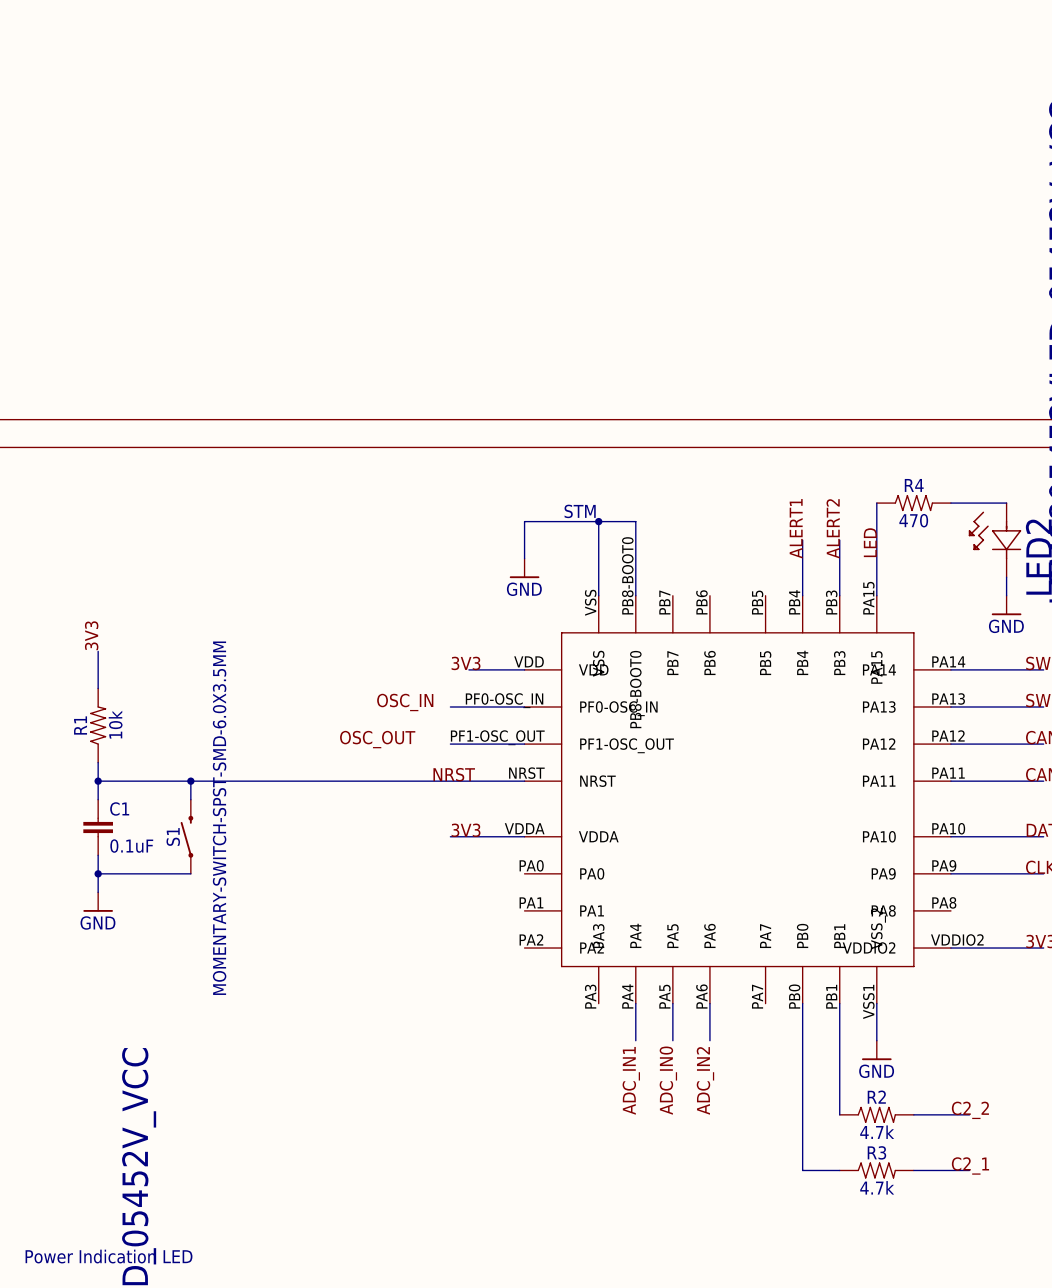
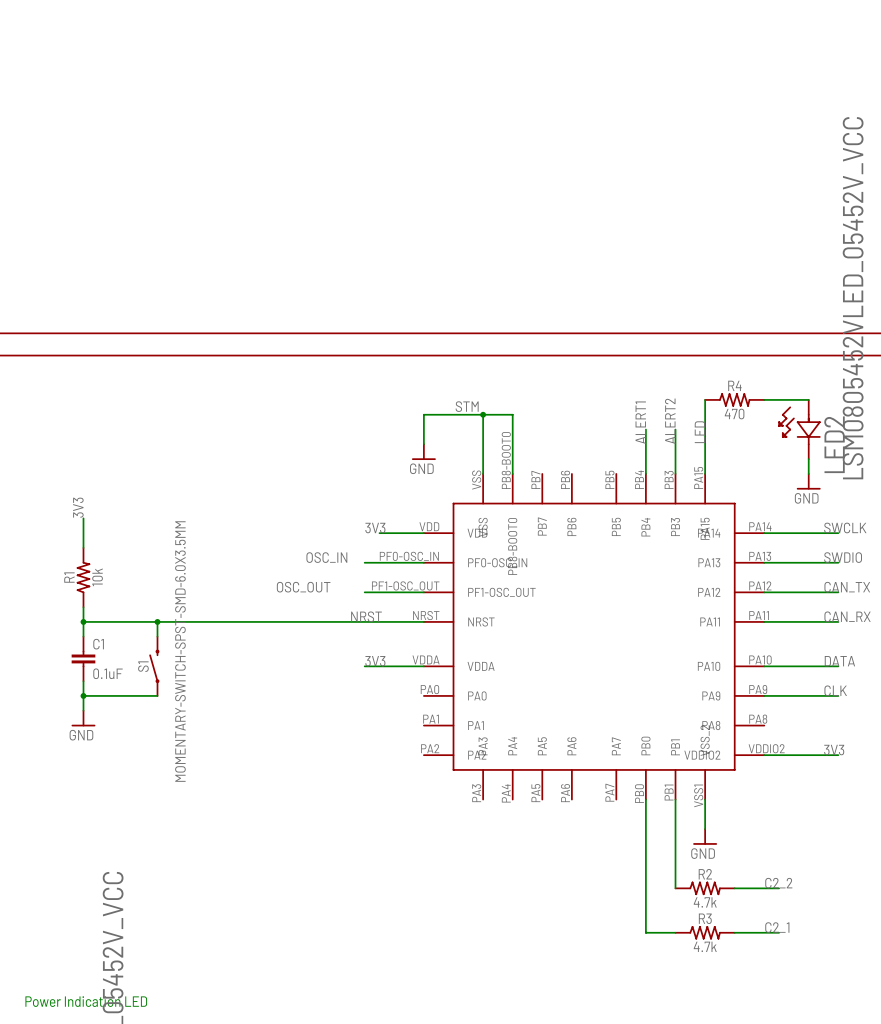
wire: (635, 1003) (635, 1040) -> none
wire: (672, 1003) (672, 1040) -> none
wire: (709, 1003) (709, 1040) -> none
label: ADC_IN1 (631, 1080) -> none
label: ADC_IN0 (668, 1080) -> none
label: ADC_IN2 (705, 1080) -> none

